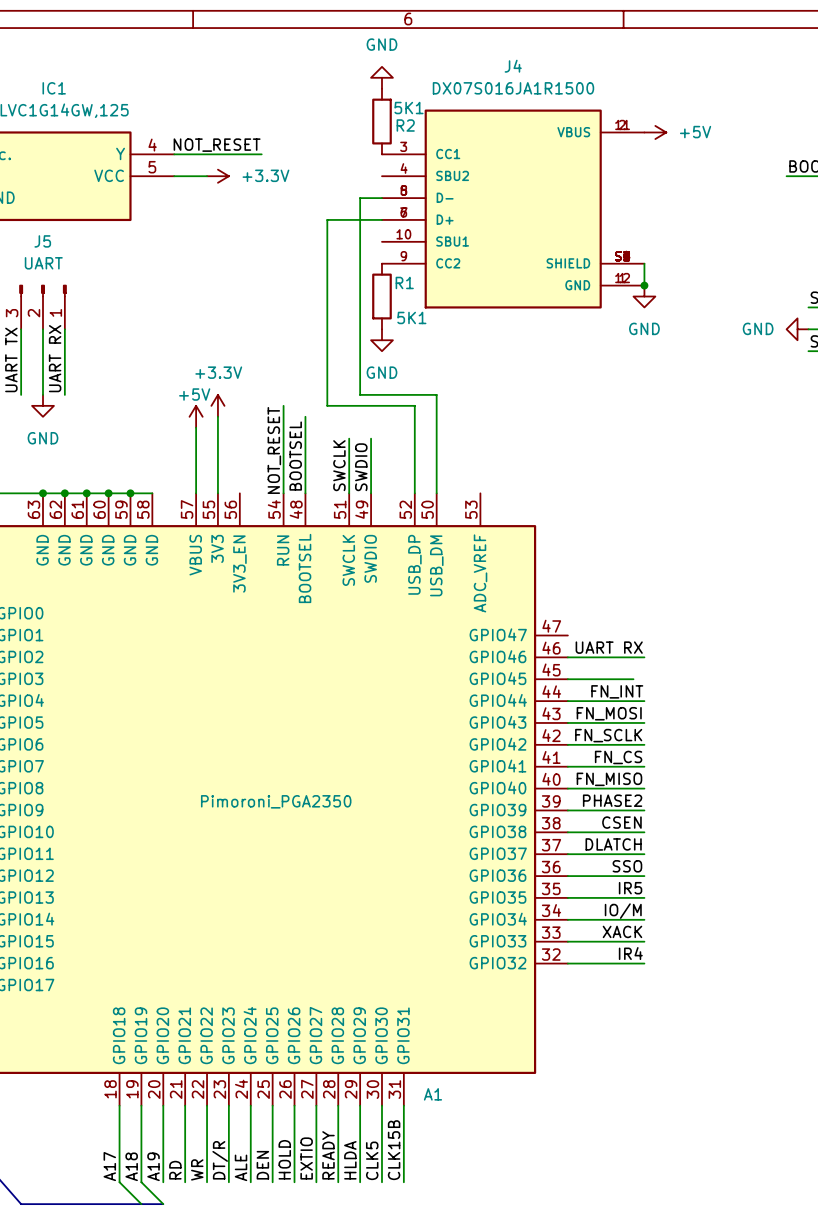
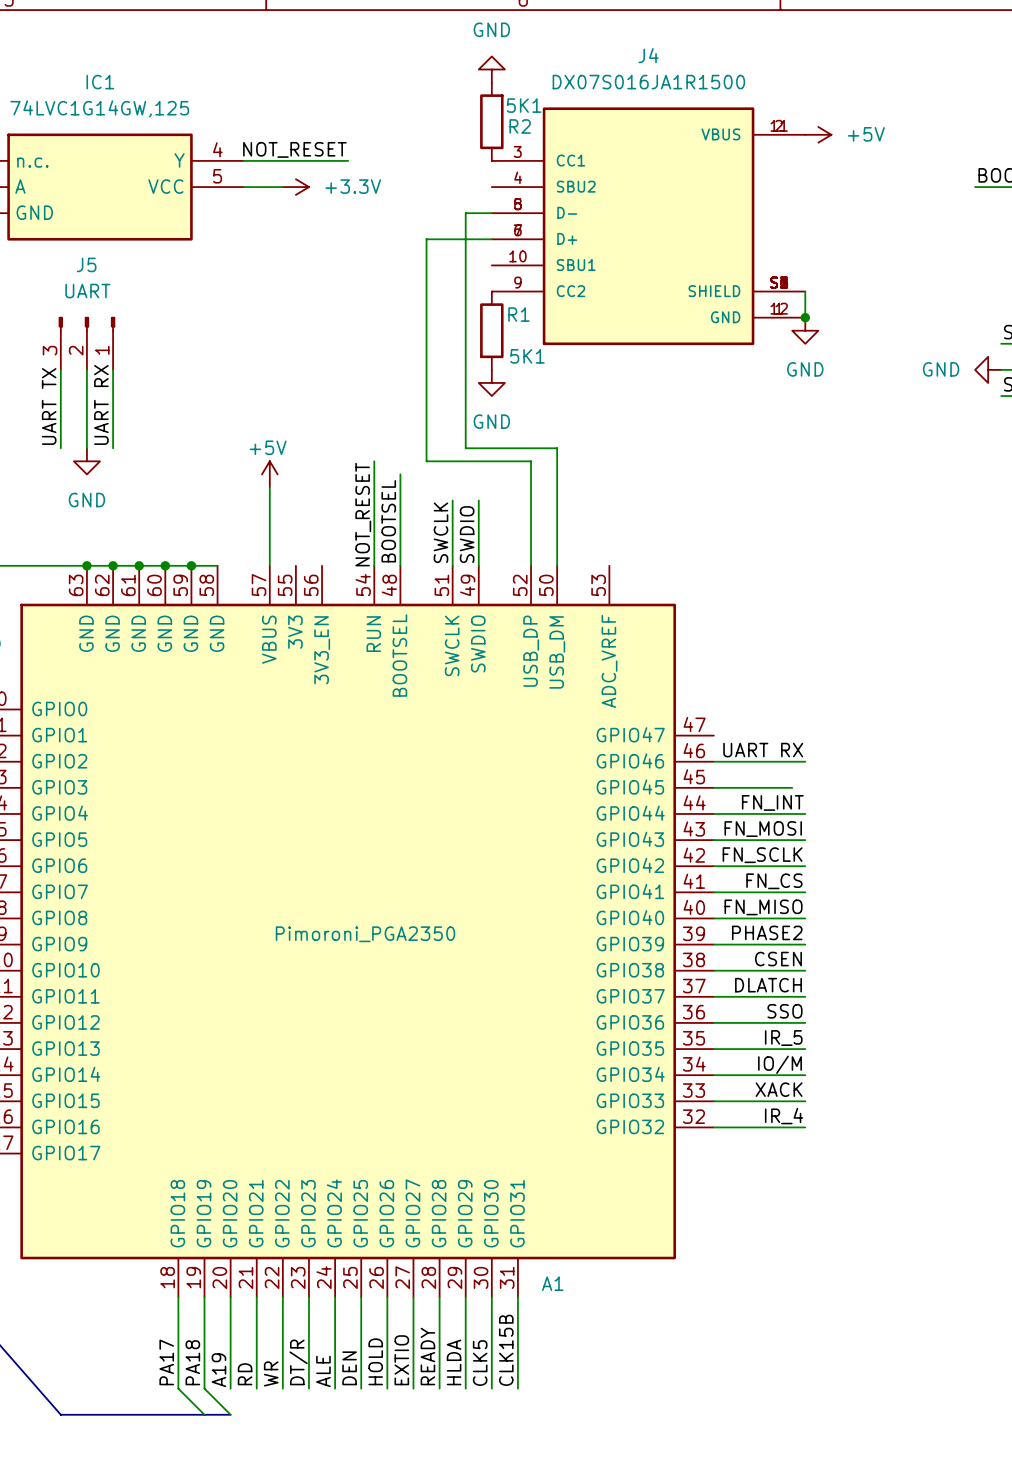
power symbol: +3.3V (217, 405) -> none
wire: (217, 416) (217, 493) -> none
label: IR5 (630, 888) -> IR_5 (783, 1038)
label: IR4 (630, 953) -> IR_4 (784, 1116)
label: A17 (109, 1166) -> PA17 (166, 1362)
label: A18 (131, 1166) -> PA18 (192, 1362)

